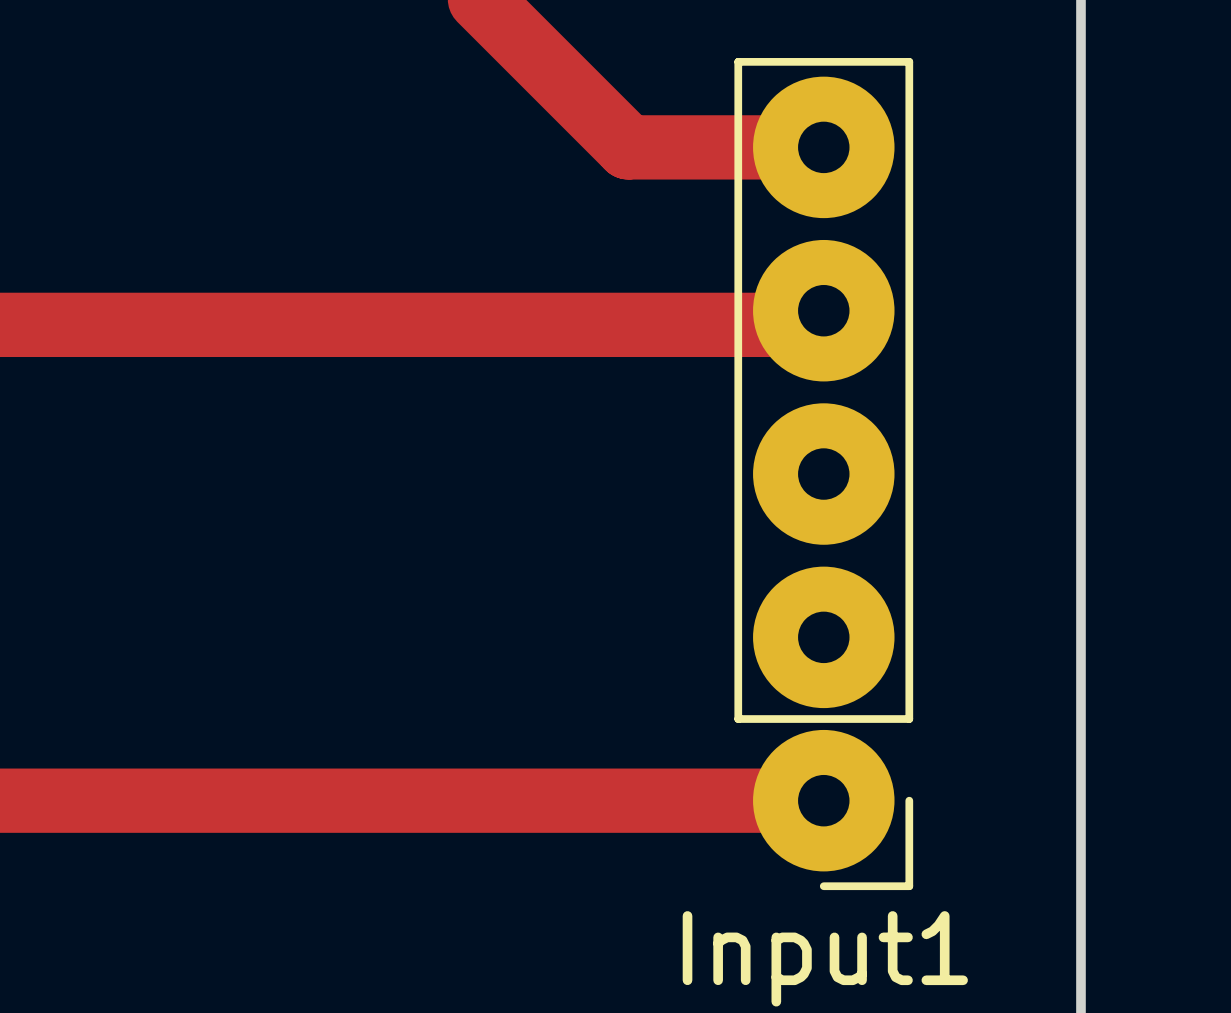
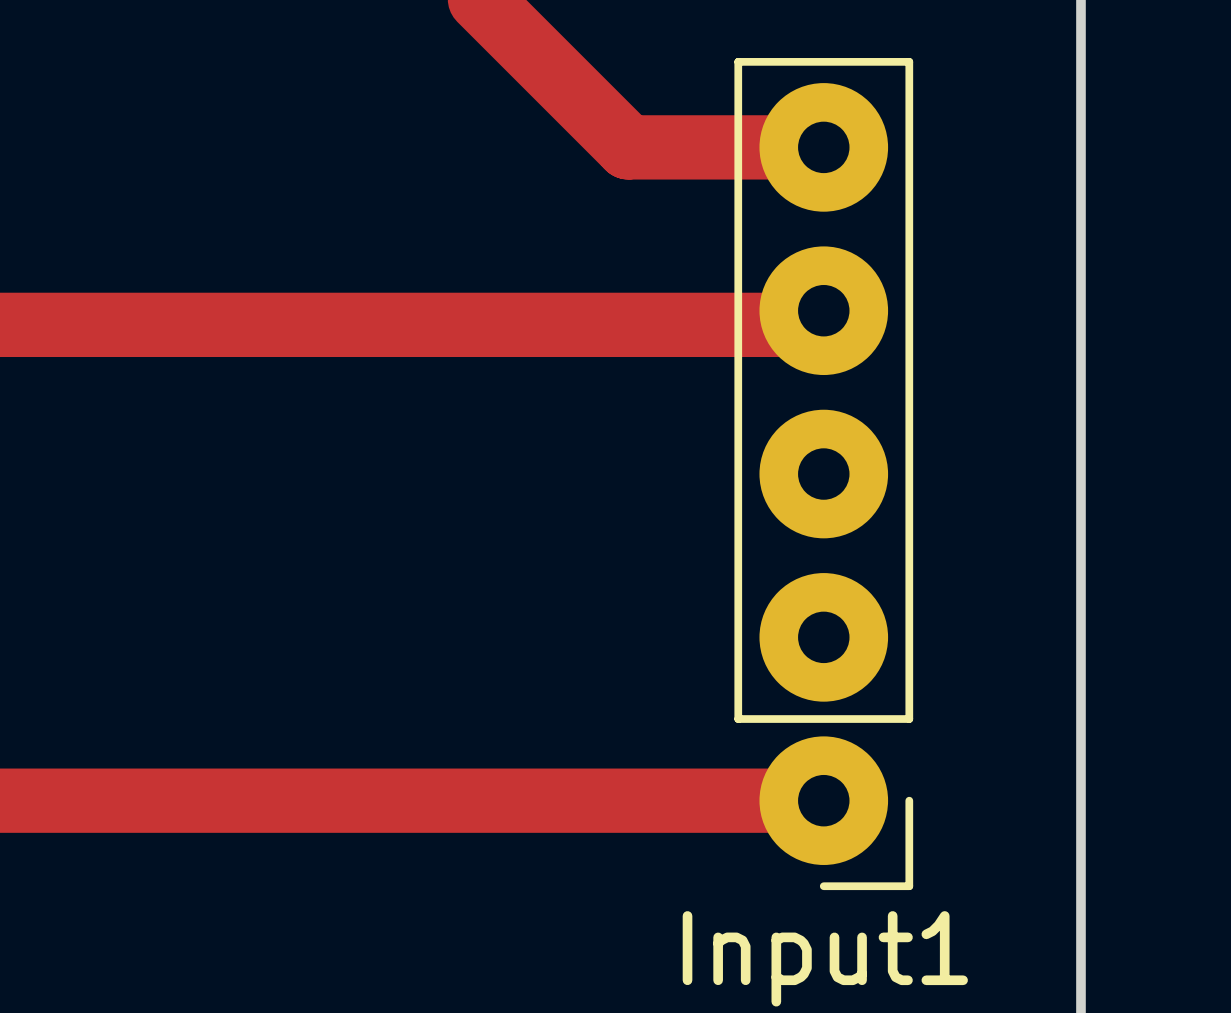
Input1 footprint: [734, 58, 914, 891] -> [734, 58, 914, 891]

